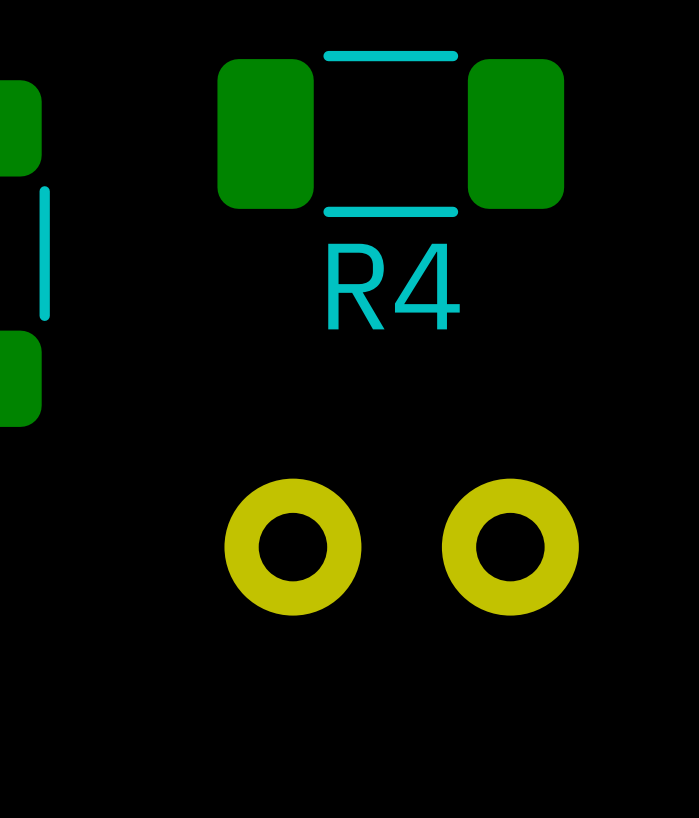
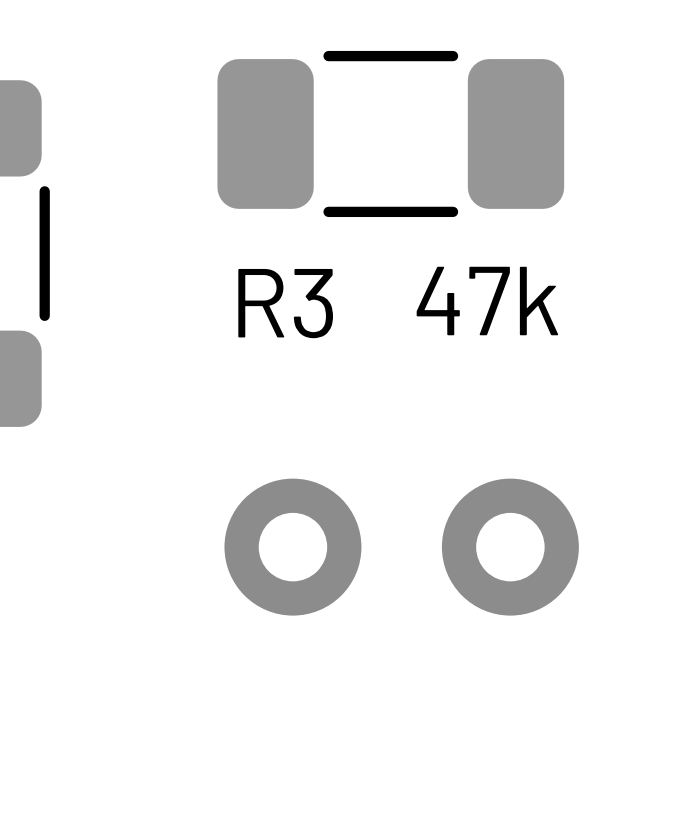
R4 name: R4 (393, 286) -> R3 (285, 303)
R4 value: none -> 47k (487, 301)

